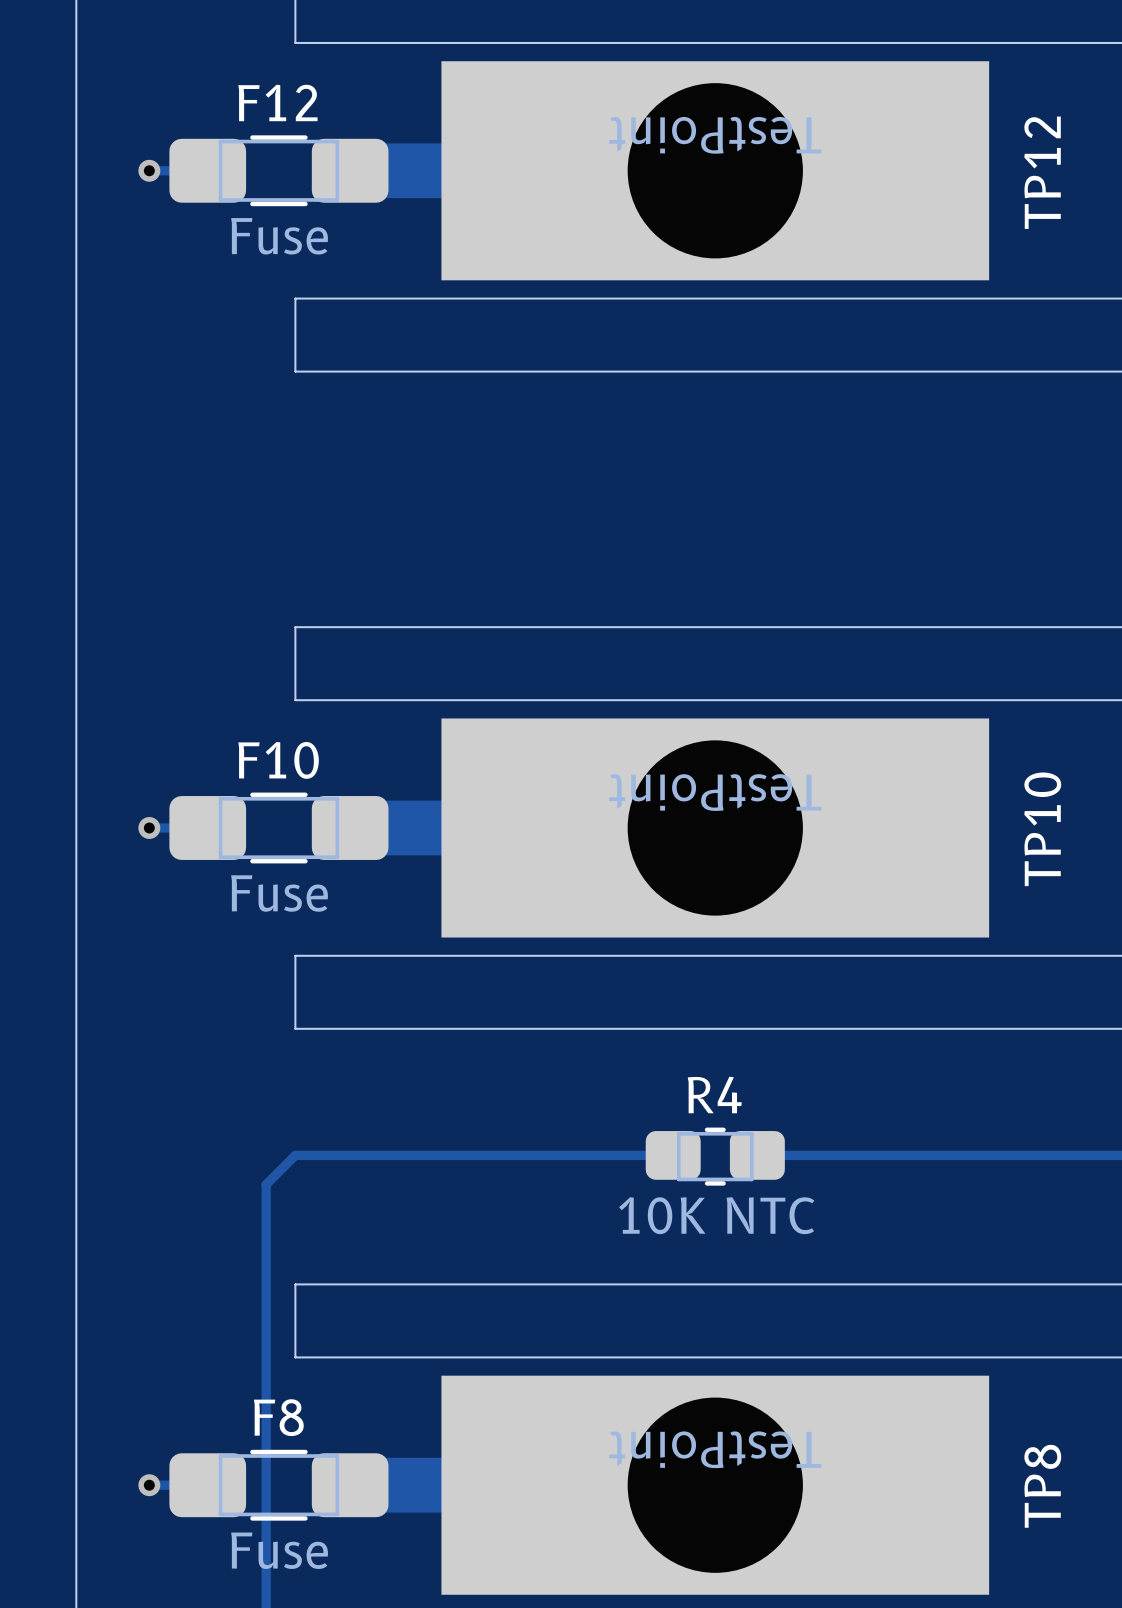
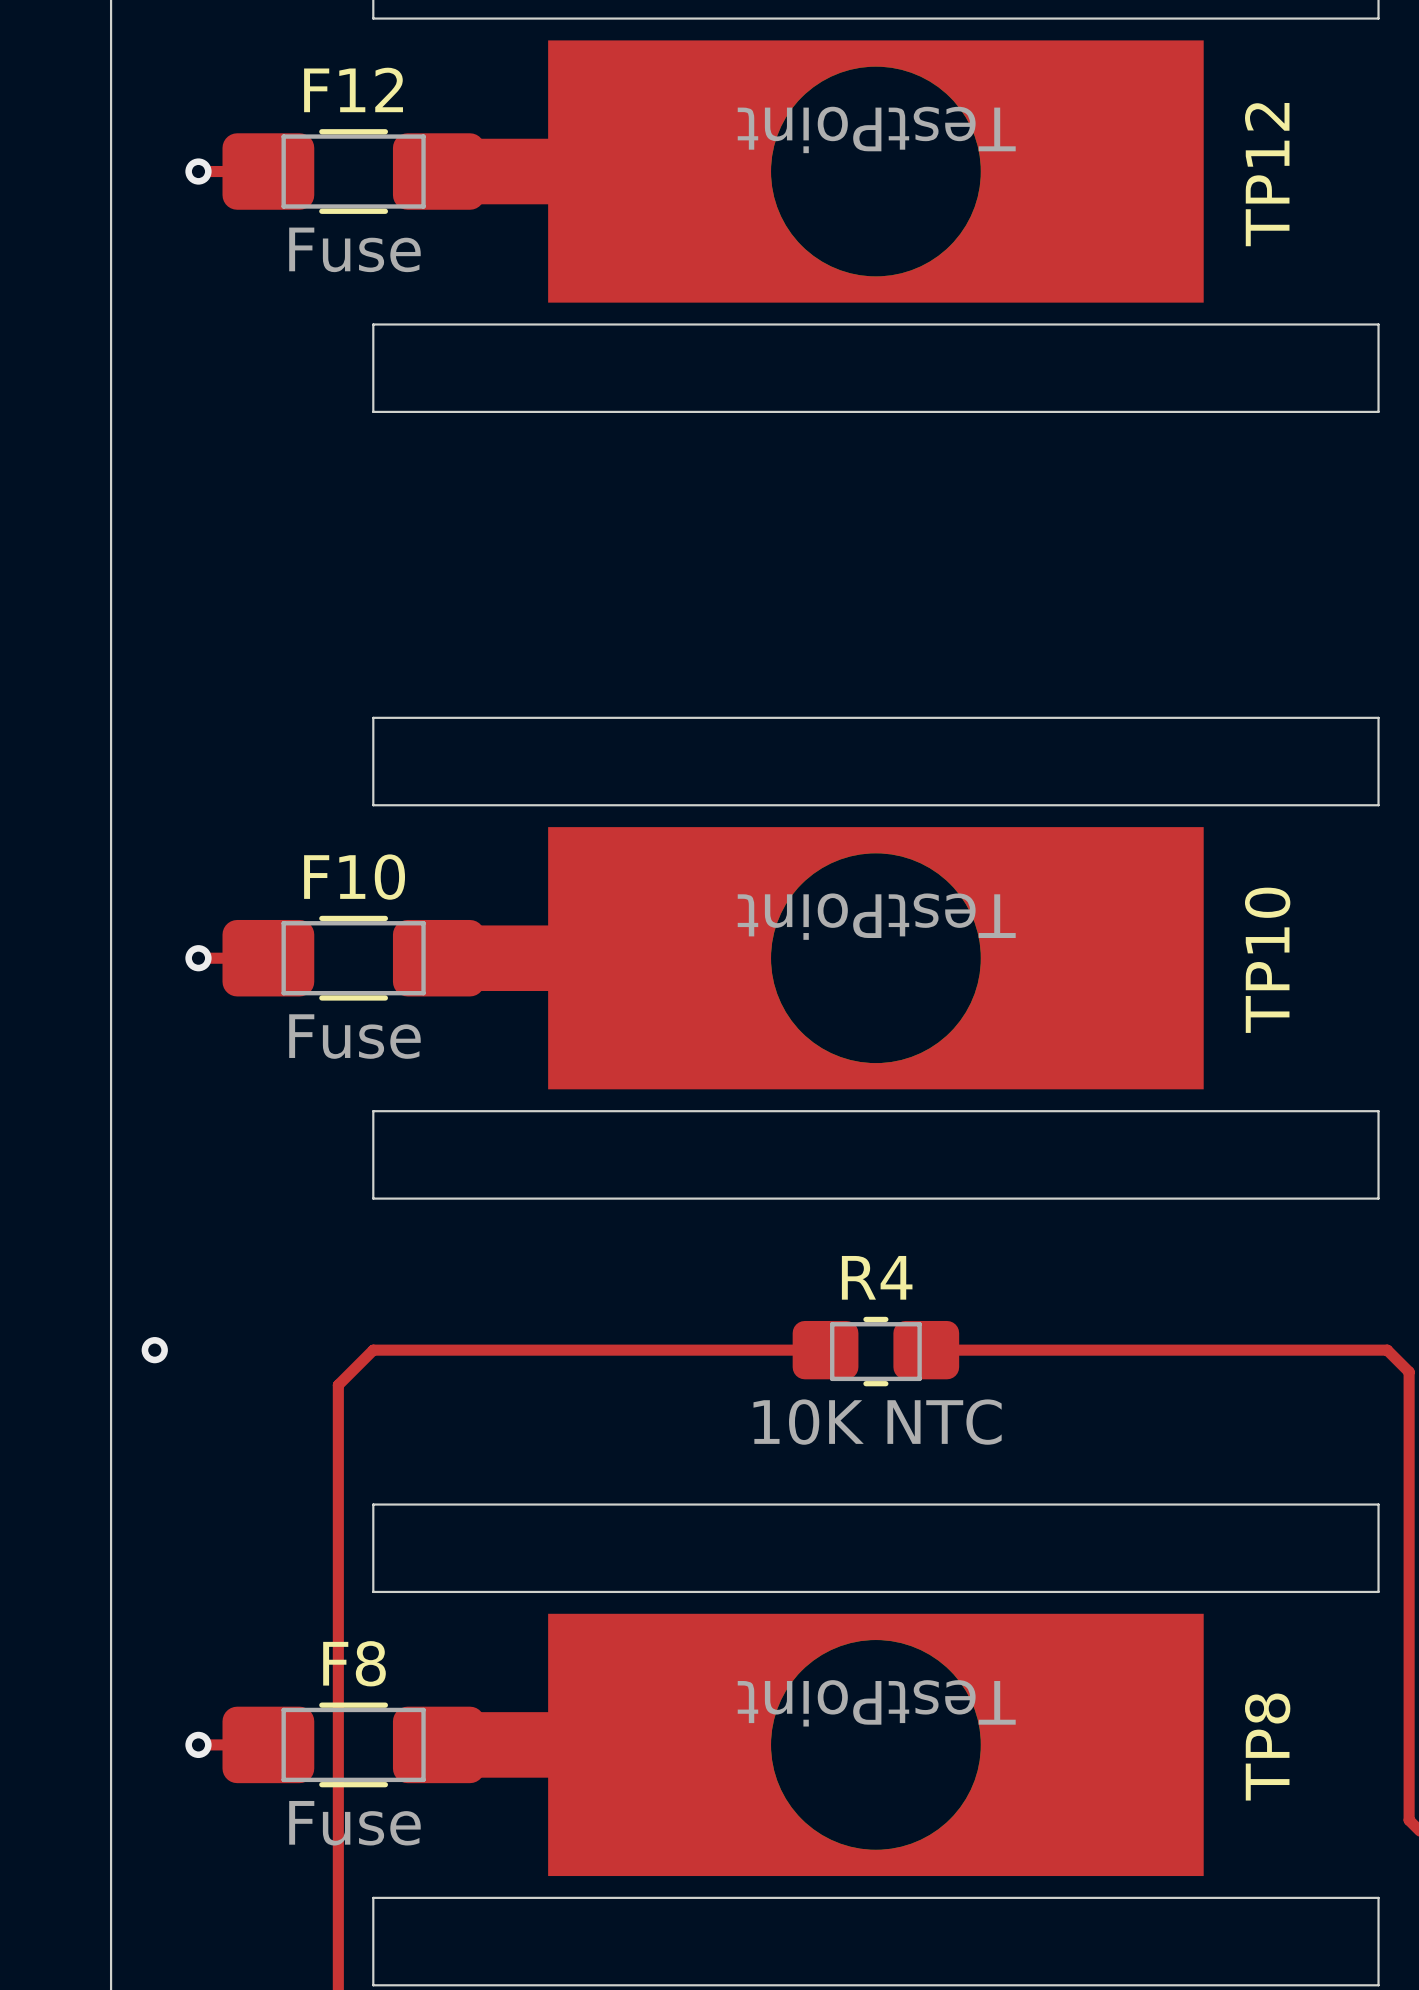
via: none -> (154, 1350)

